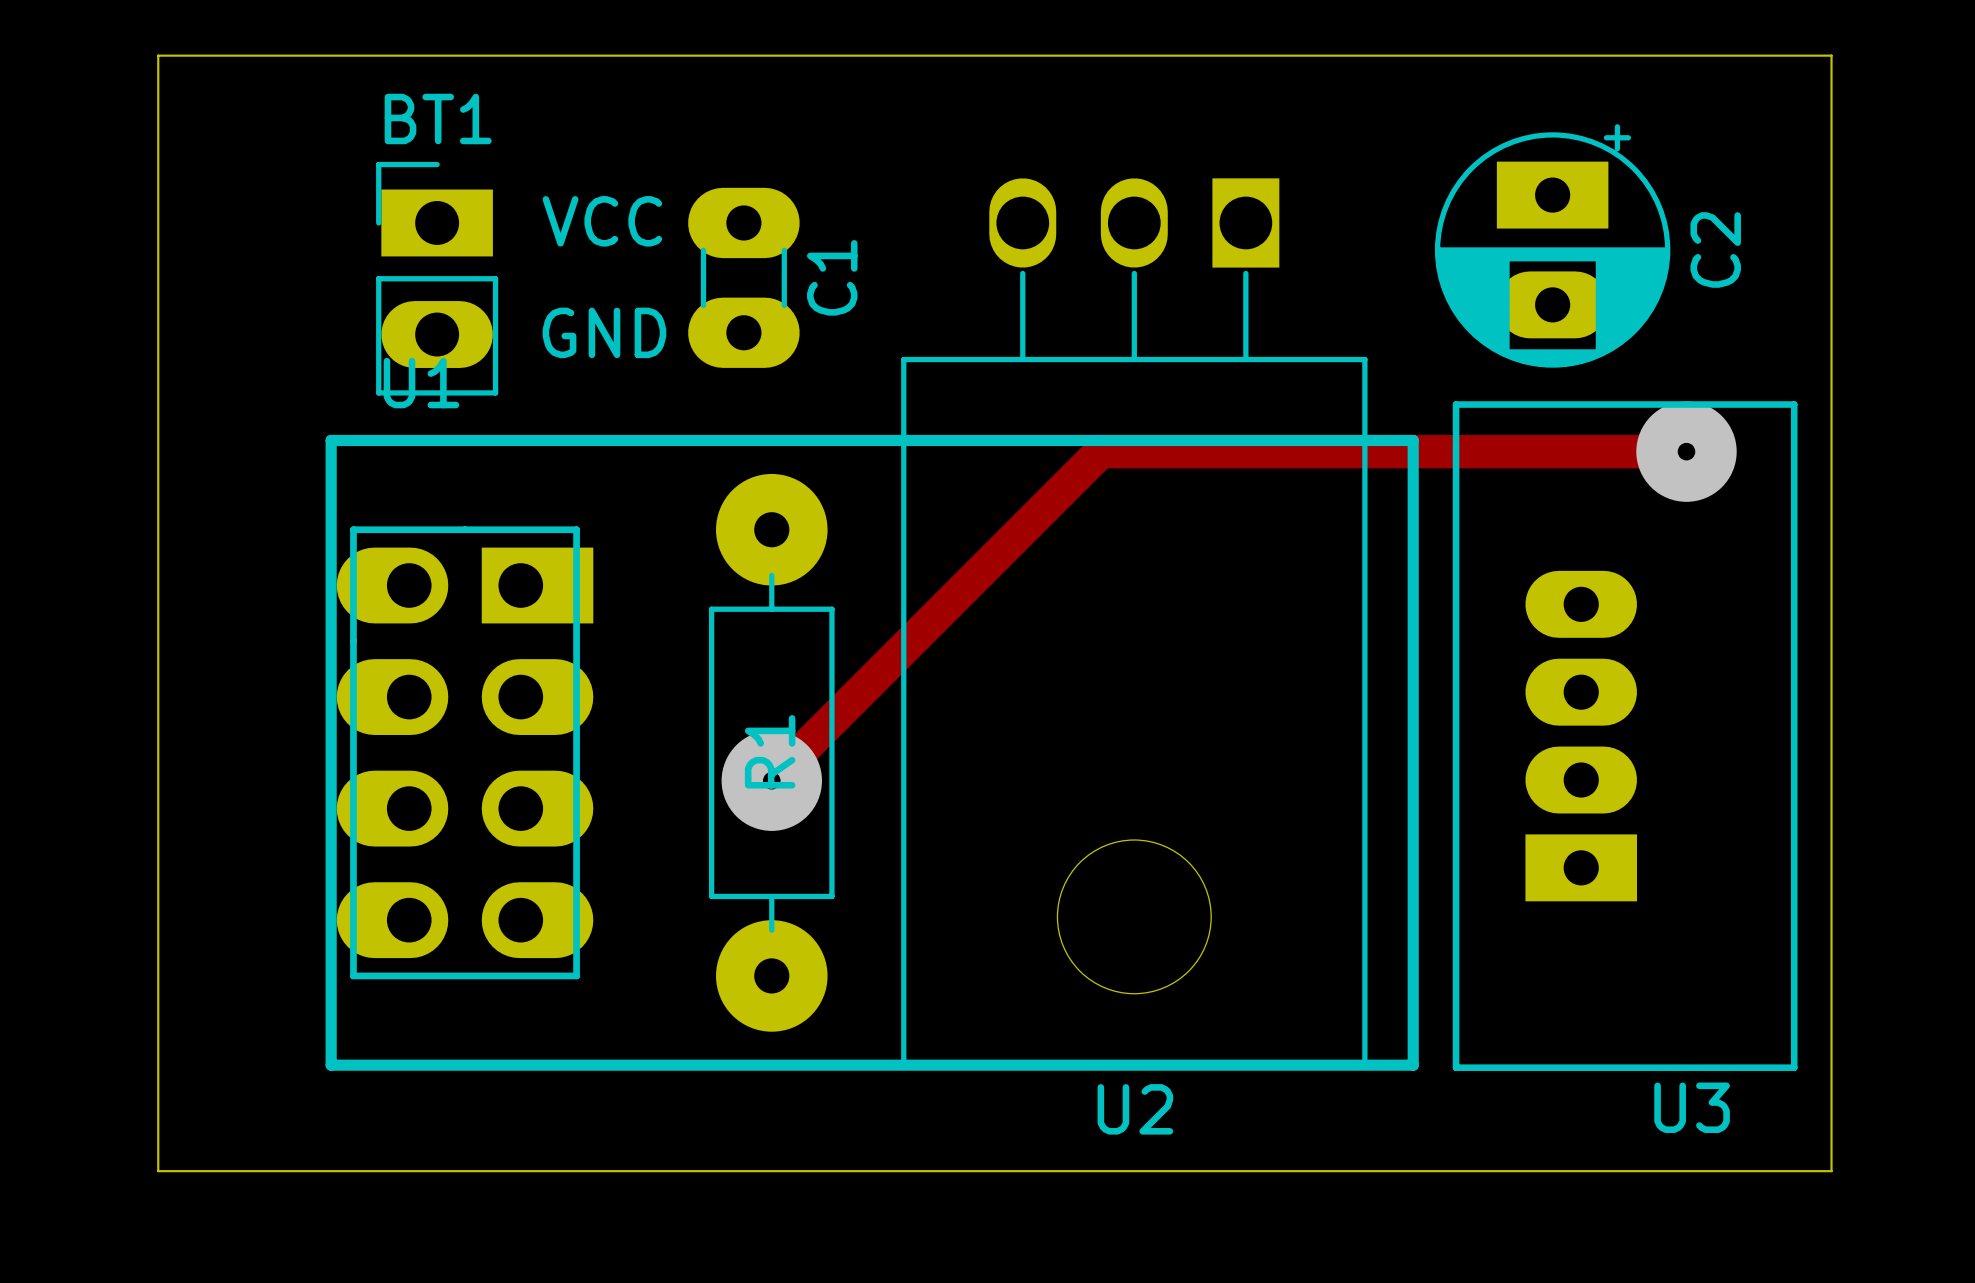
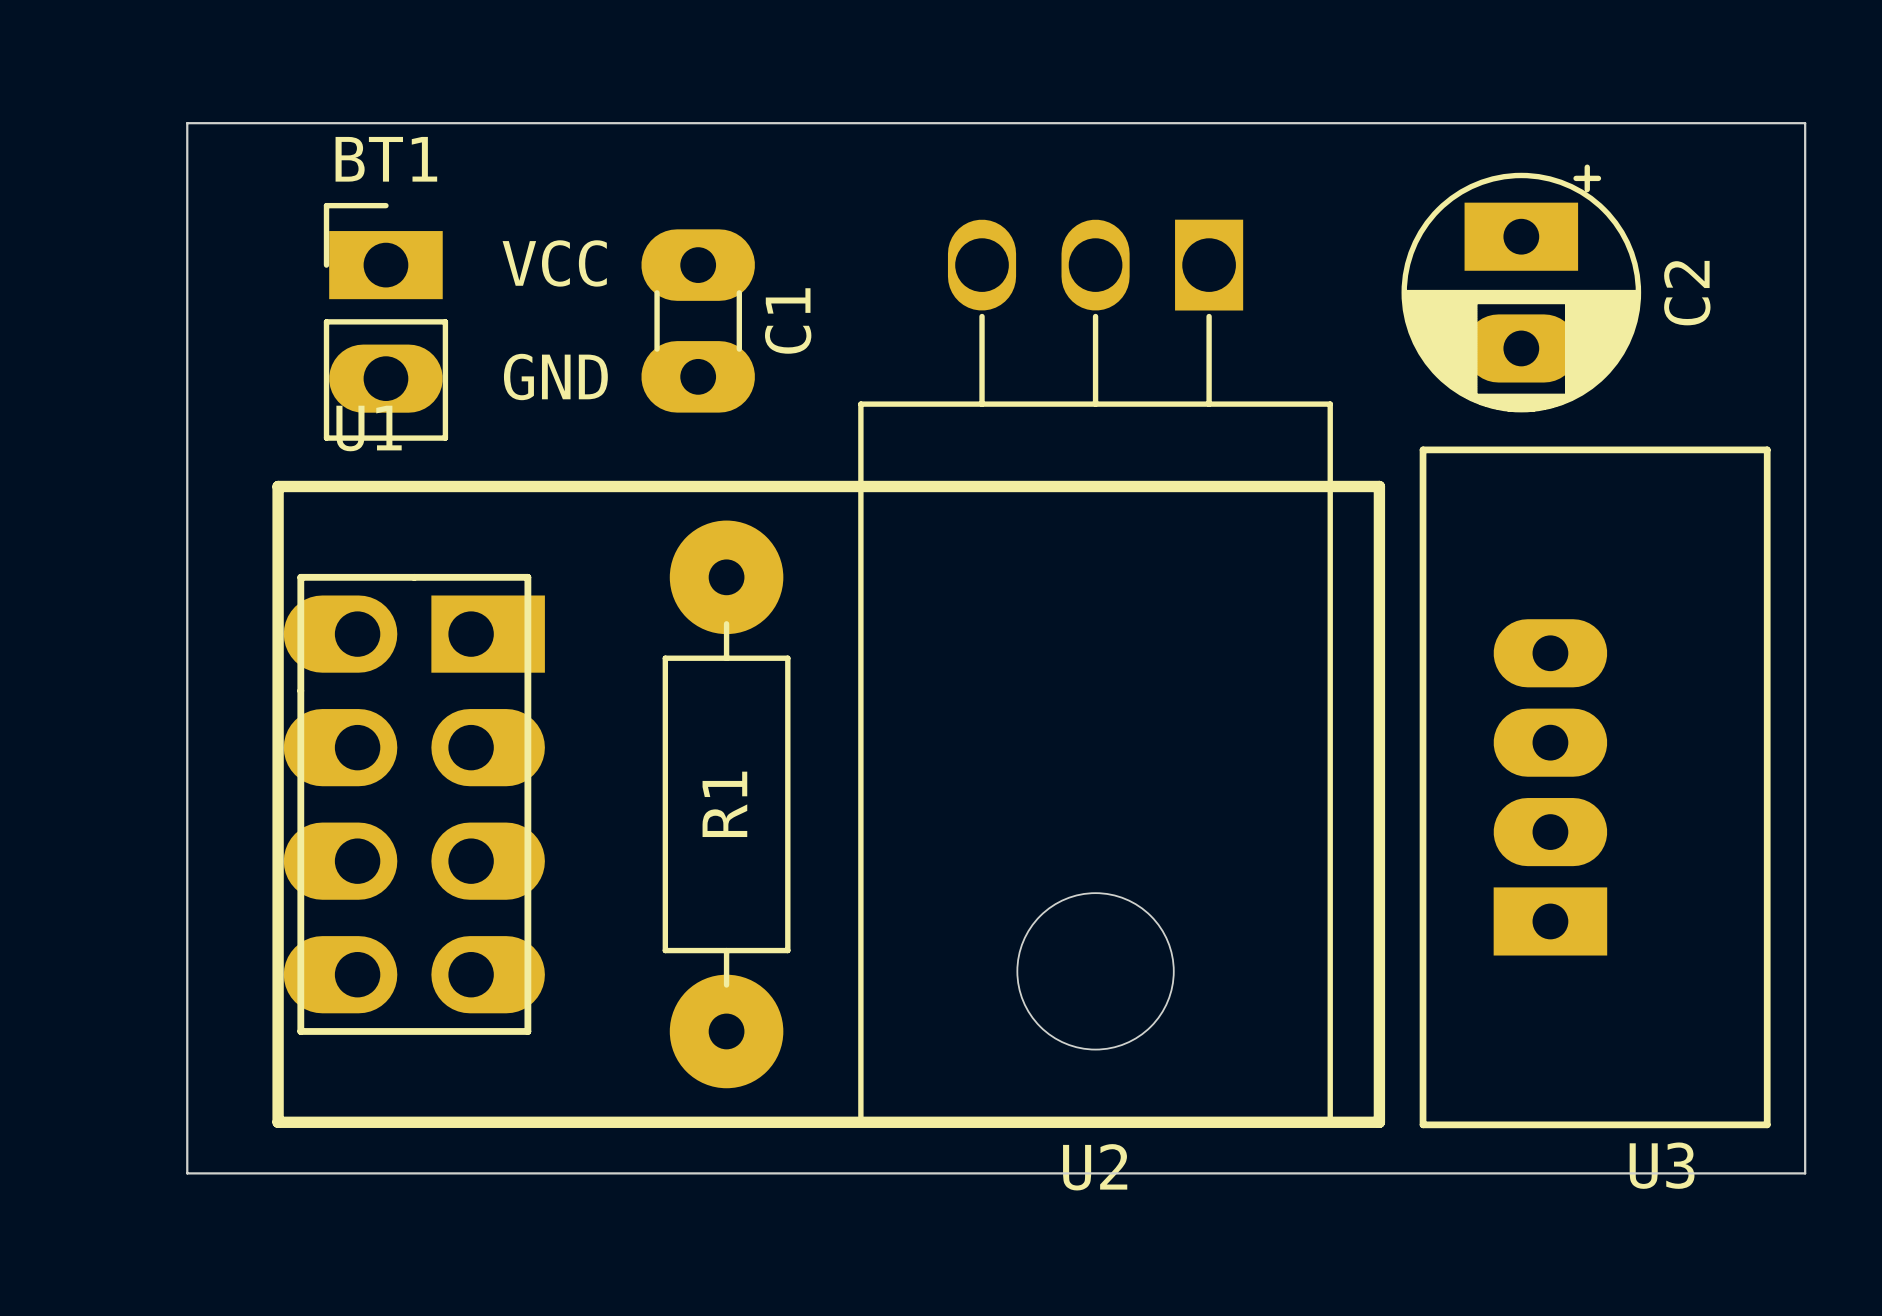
board edge: (1831, 83) (1831, 55) (158, 55) (158, 1171) (1831, 1171) (1831, 1115) -> (1805, 123) (187, 123) (187, 1173) (1805, 1173)
track: (1686, 451) (1100, 451) (771, 780) -> none
via: (1686, 451) -> none
via: (771, 780) -> none

